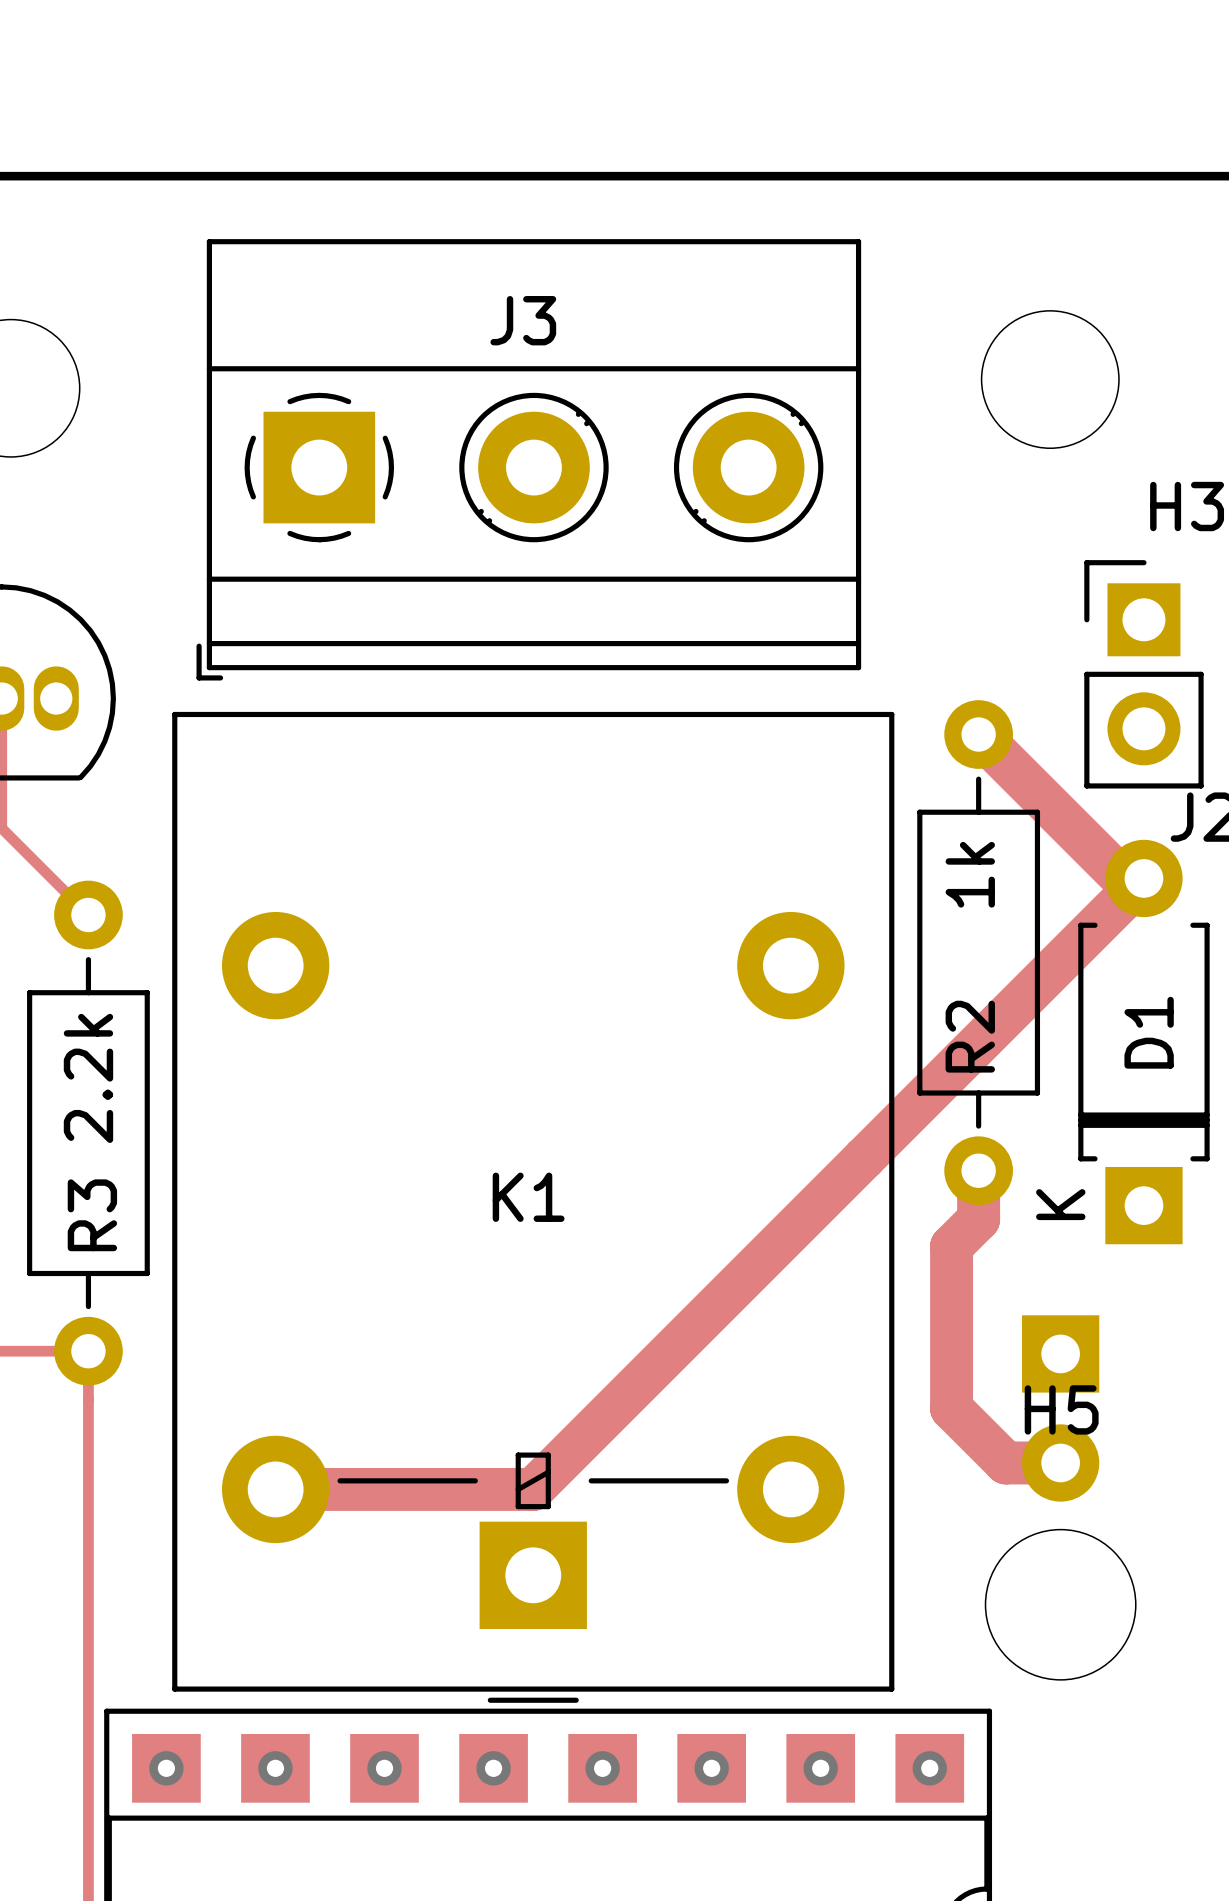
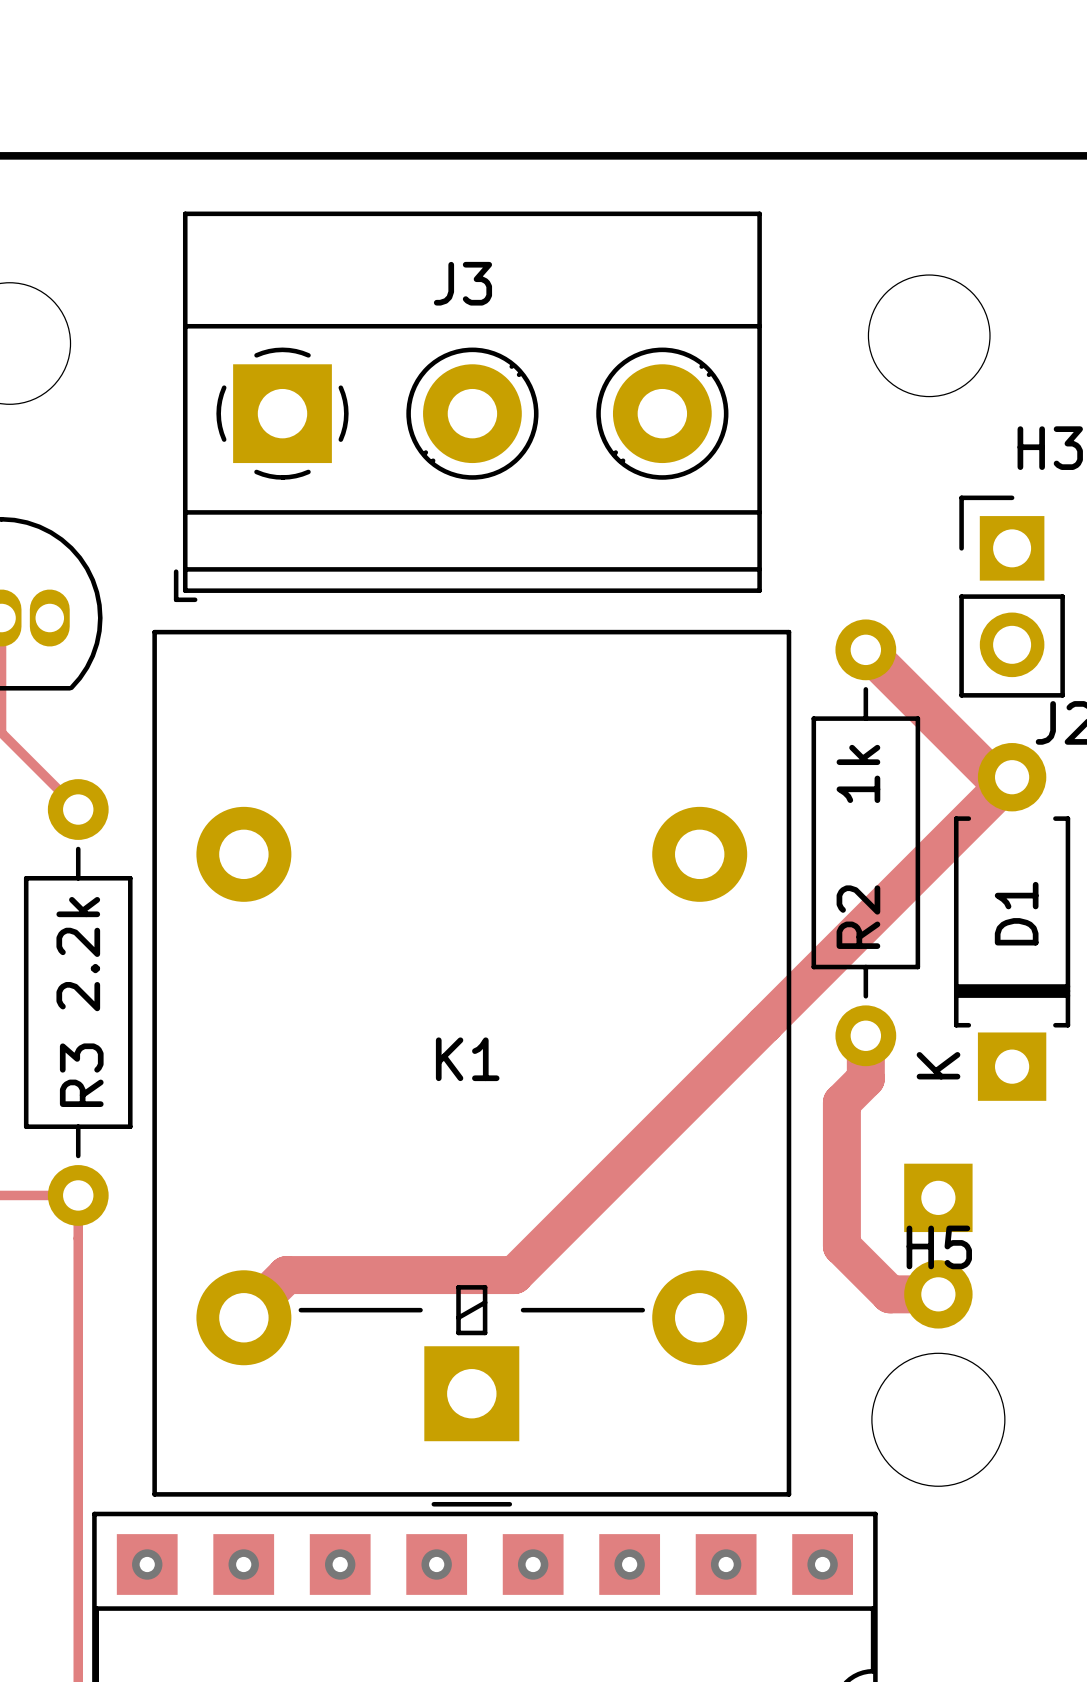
track: (581, 1441) (532, 1489) (275, 1489) -> (514, 1275) (286, 1275) (243, 1317)

